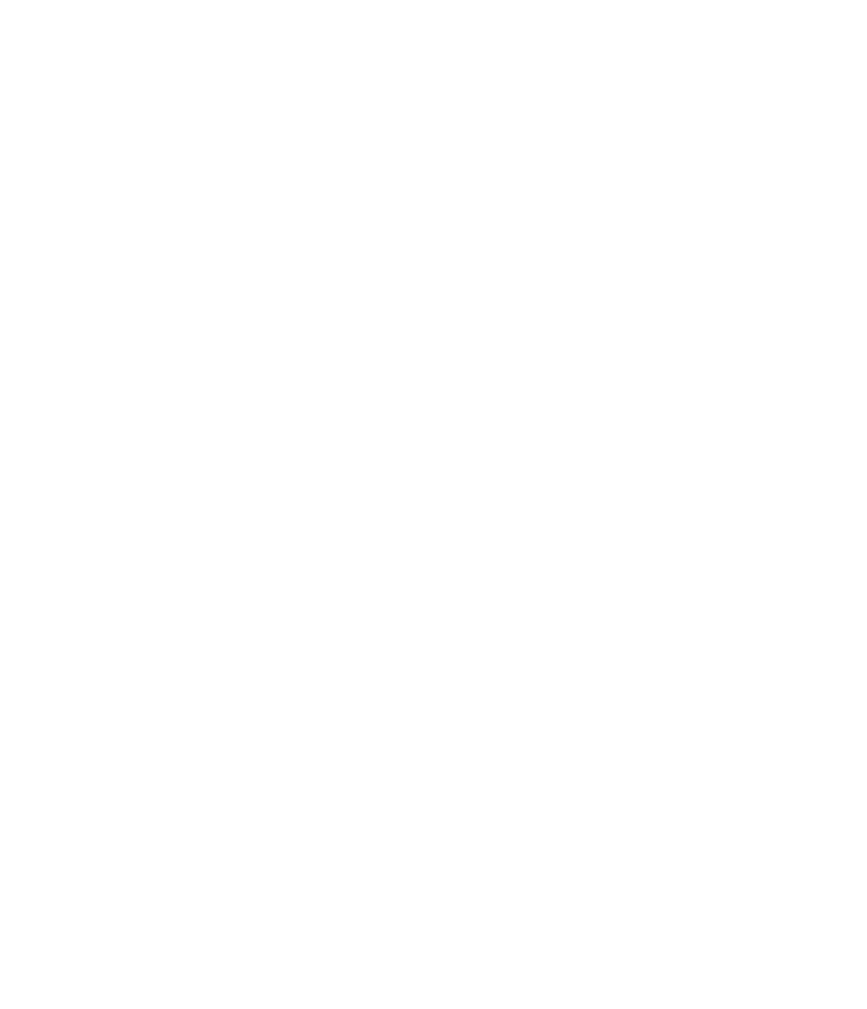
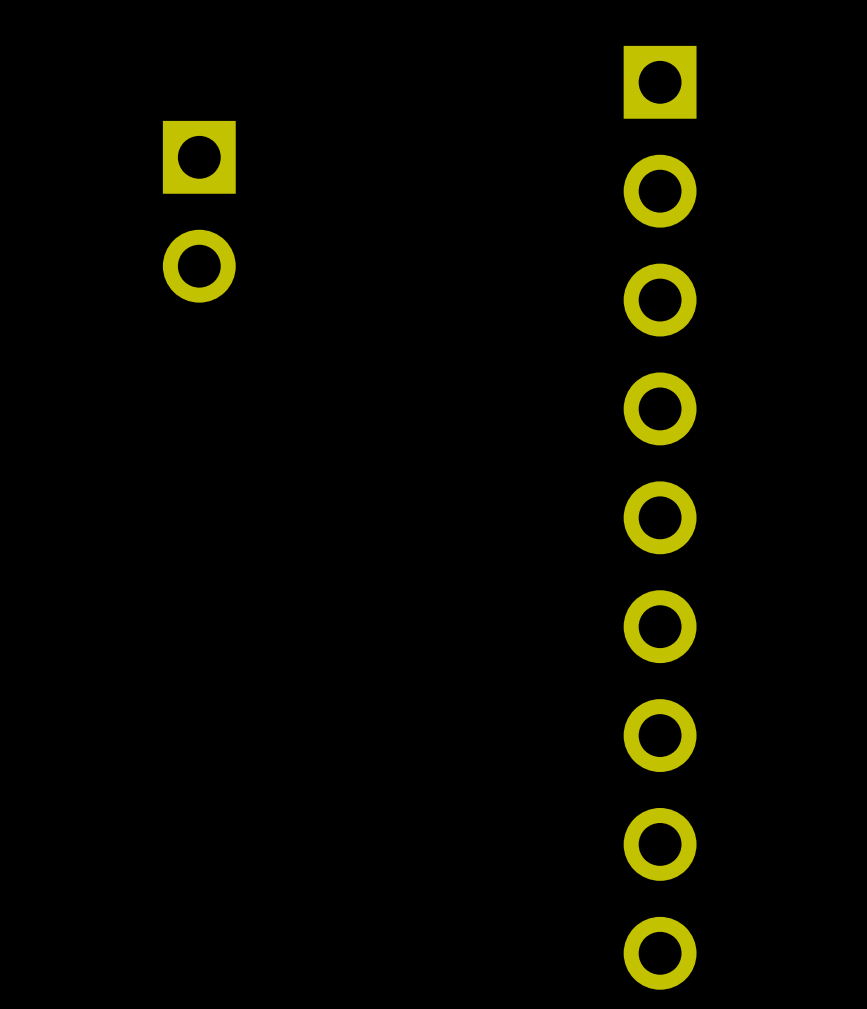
part: none -> (199, 211)
part: none -> (660, 517)

